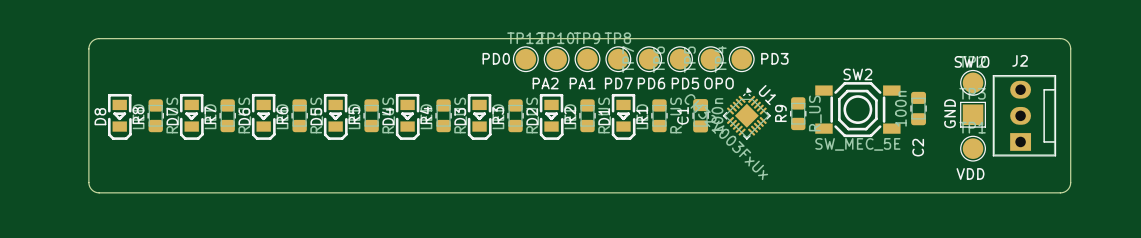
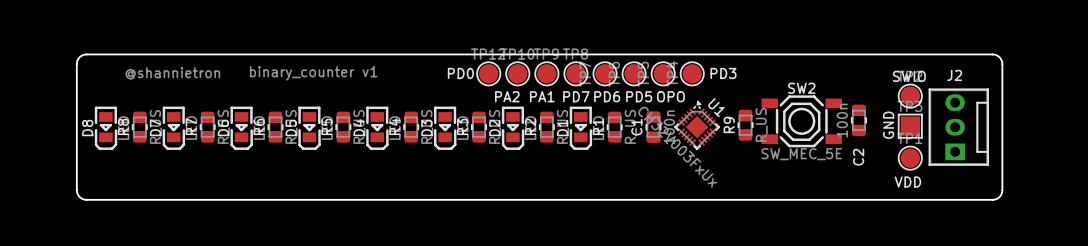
text: none -> @shannietron (172, 73)
text: none -> binary_counter v1 (313, 73)

